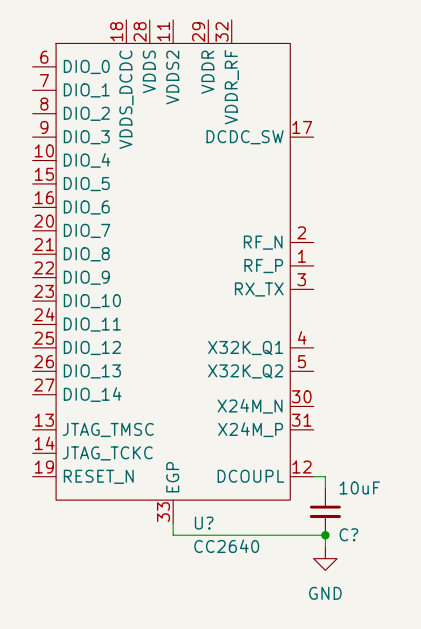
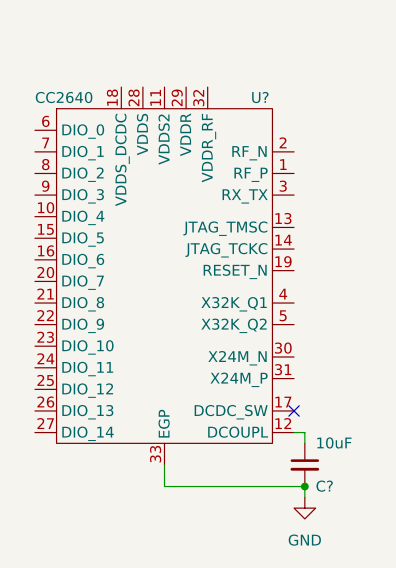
U?: CC2640 (173, 271) -> none
U?: none -> CC2640 (164, 276)
no-connect mark: none -> (294, 410)

